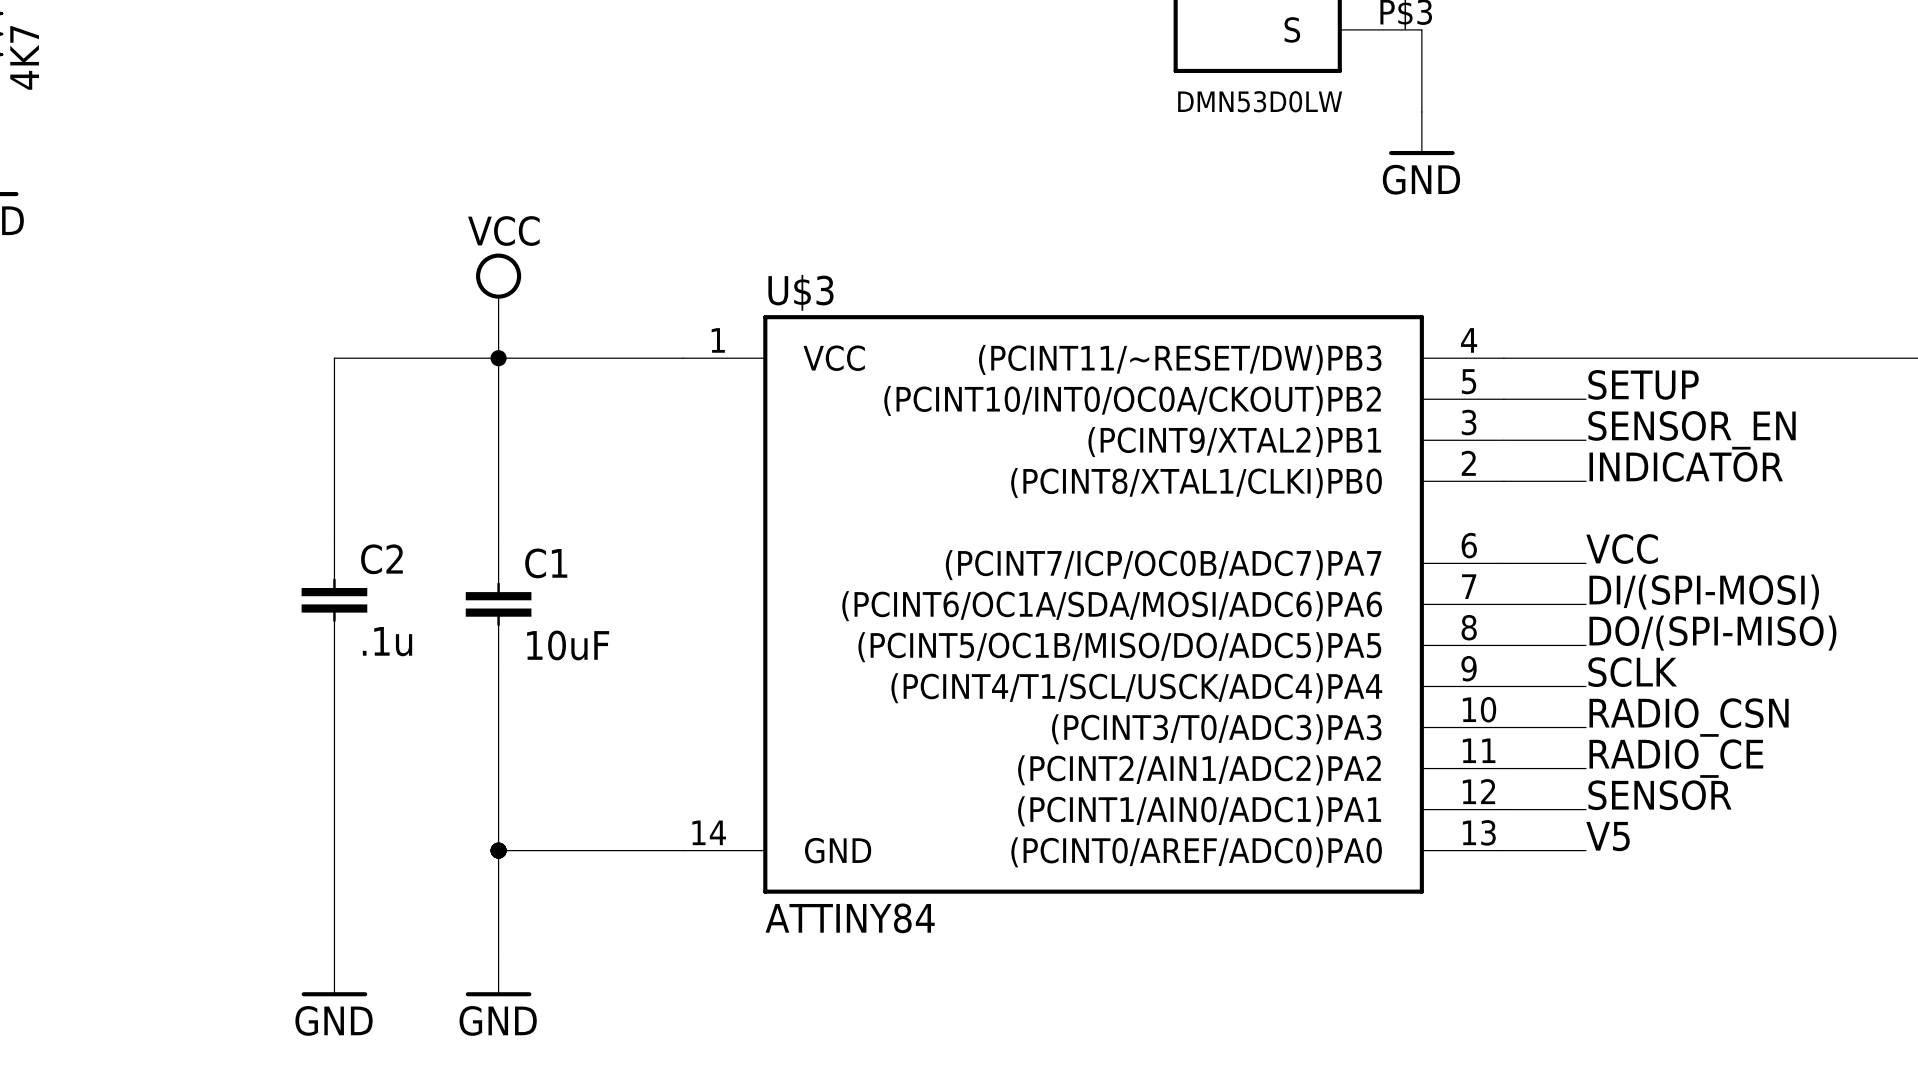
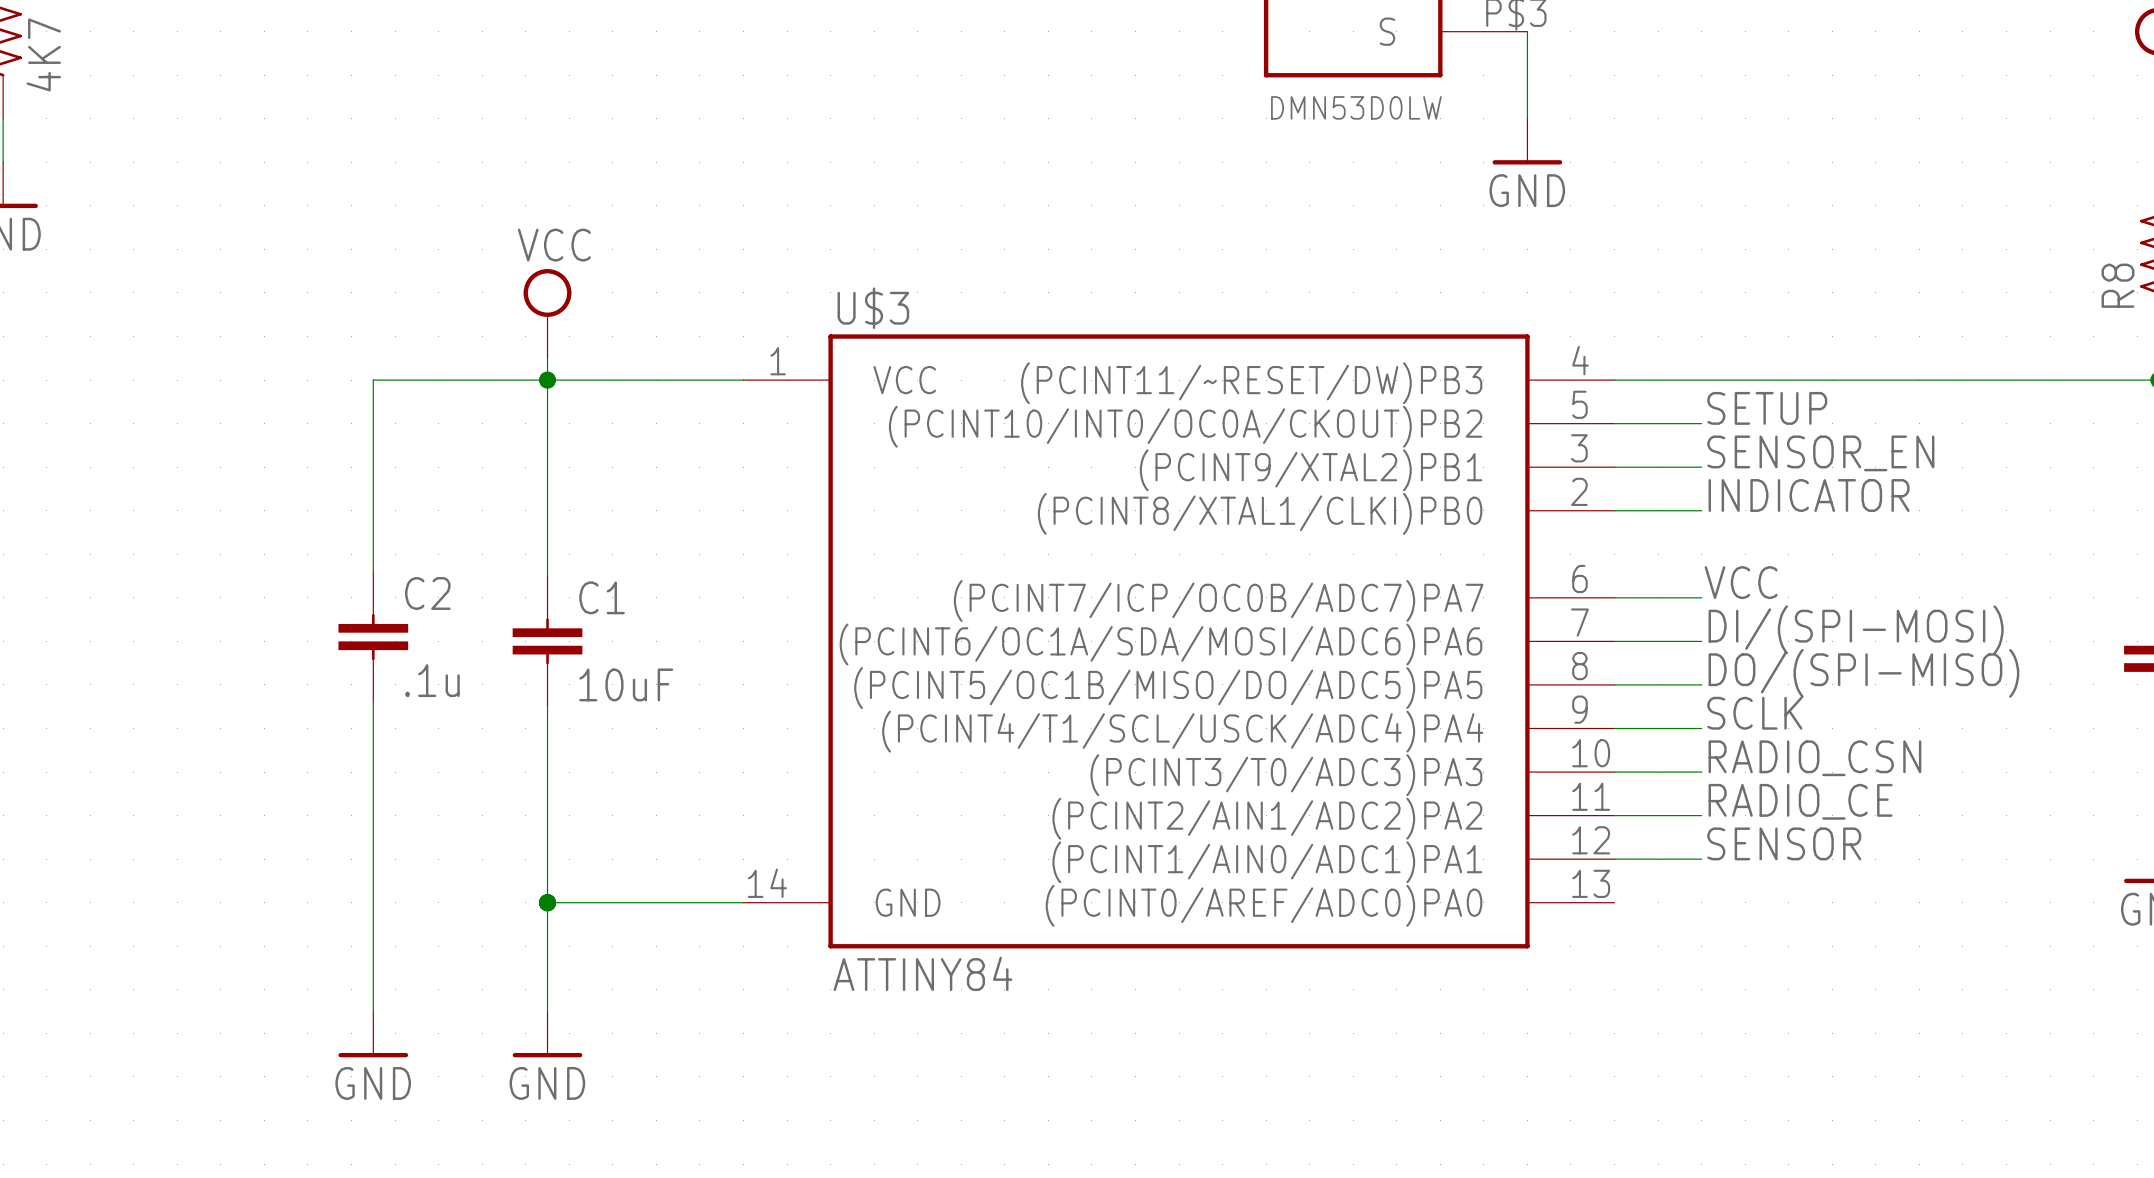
label: V5 (1608, 836) -> none
wire: (1503, 850) (1586, 850) -> none

